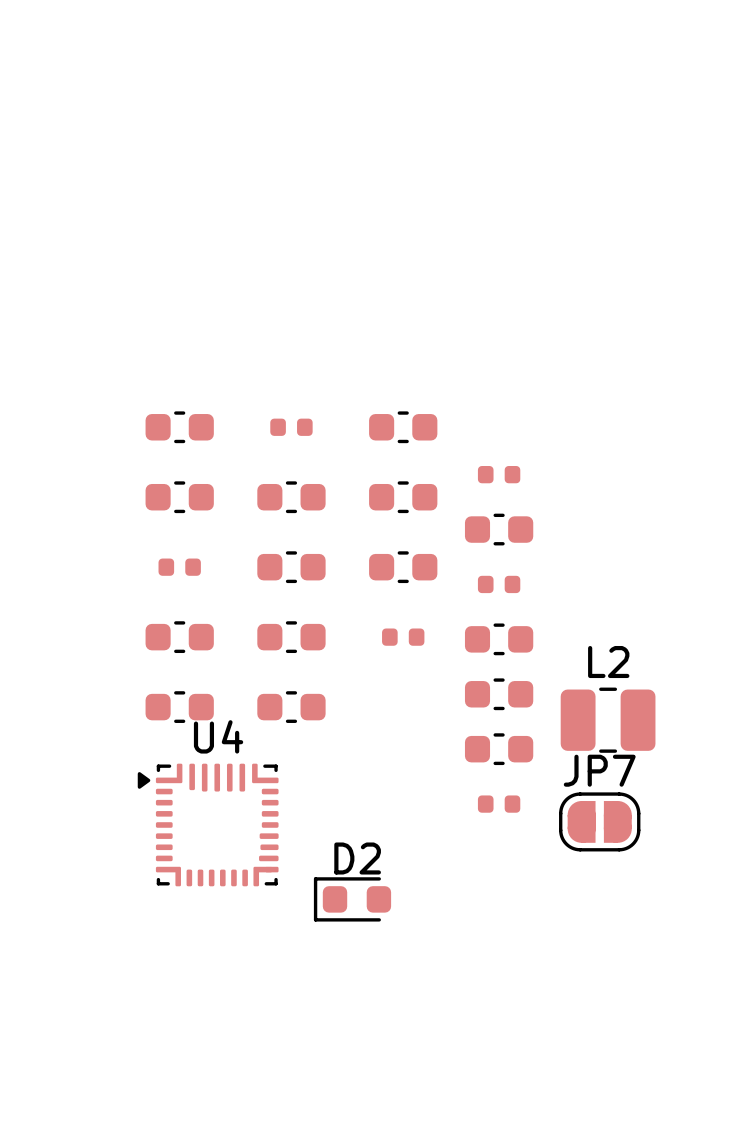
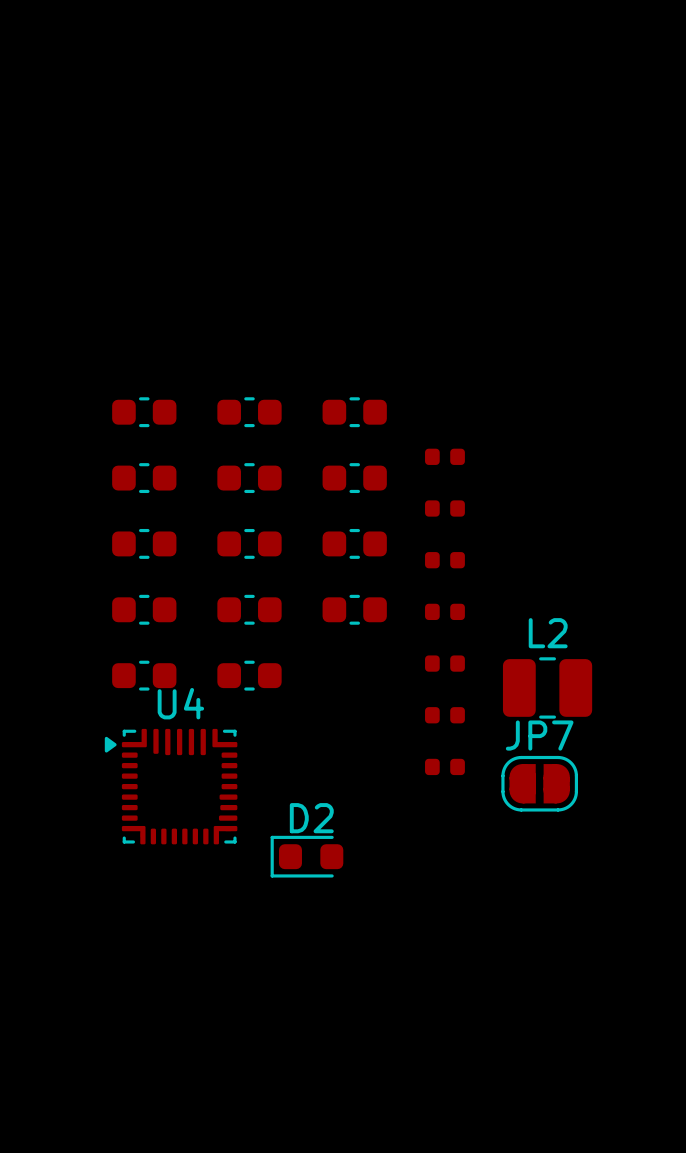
part footprint: [270, 418, 313, 436] -> [217, 397, 282, 428]
part footprint: [464, 513, 534, 546] -> [425, 500, 465, 517]
part footprint: [158, 558, 201, 576] -> [112, 528, 177, 559]
part footprint: [464, 623, 534, 656] -> [425, 603, 465, 621]
part footprint: [382, 628, 425, 646] -> [322, 594, 387, 625]
part footprint: [464, 678, 534, 711] -> [425, 655, 465, 672]
part footprint: [464, 733, 534, 766] -> [425, 707, 465, 724]

